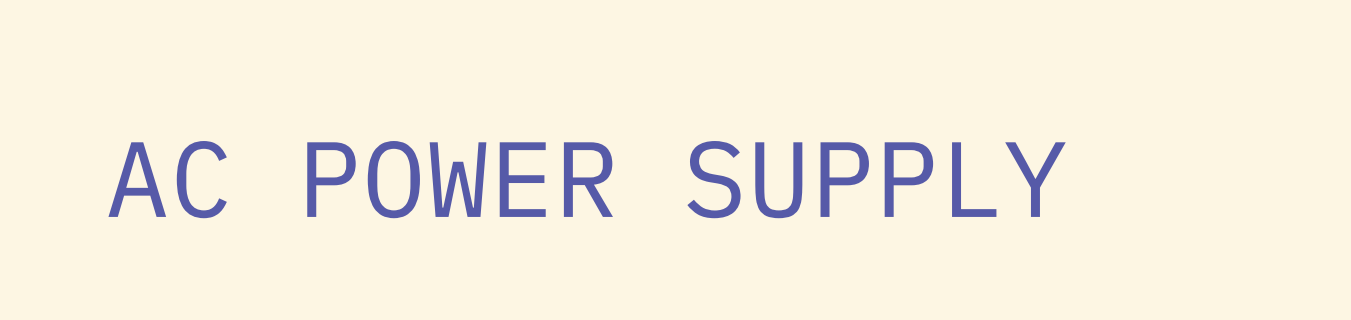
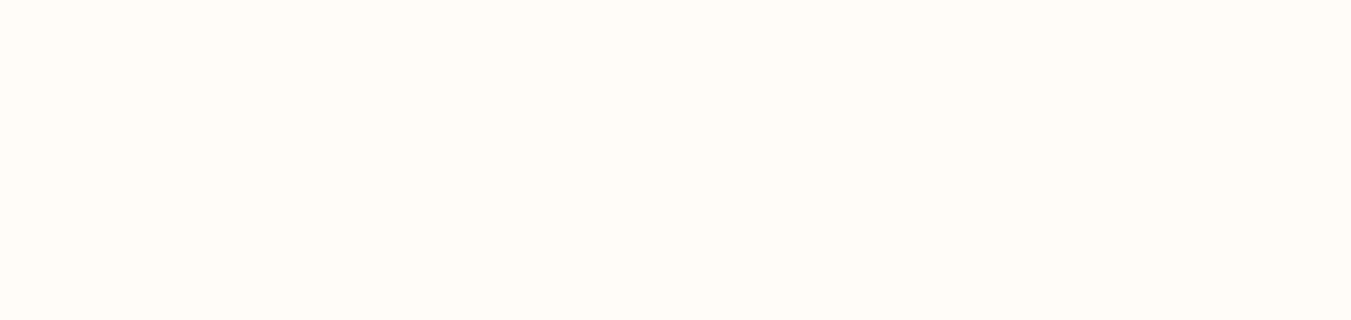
text: AC POWER SUPPLY (587, 179) -> none

